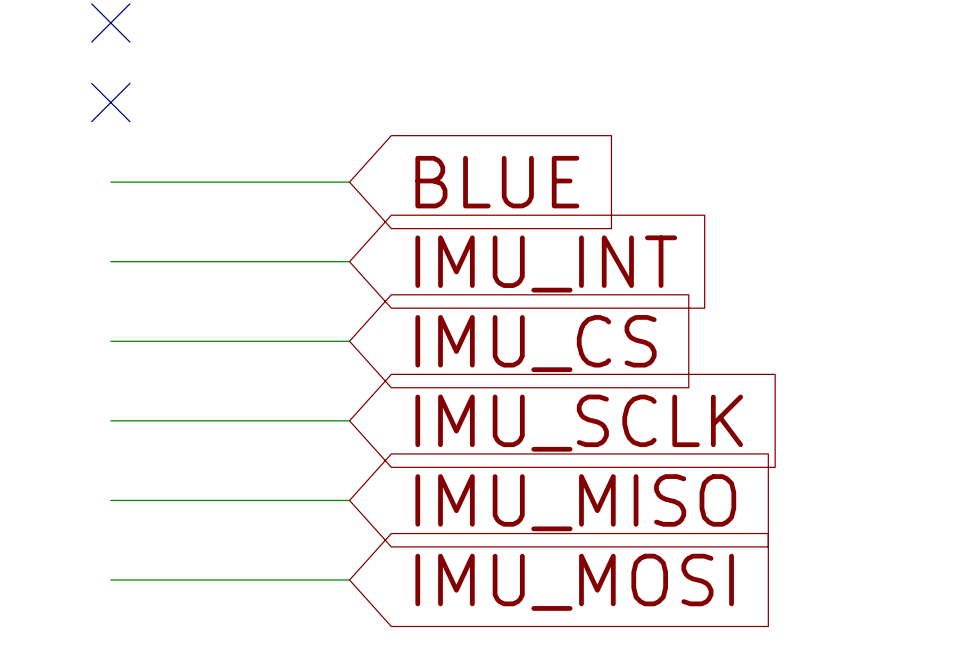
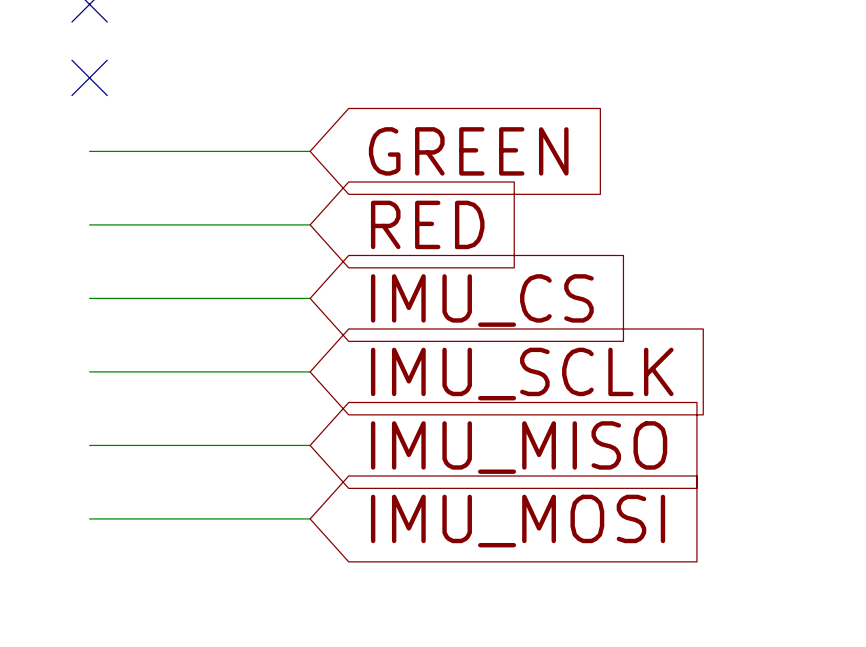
global label: BLUE (497, 182) -> GREEN (468, 151)
global label: IMU_INT (546, 263) -> RED (427, 224)

